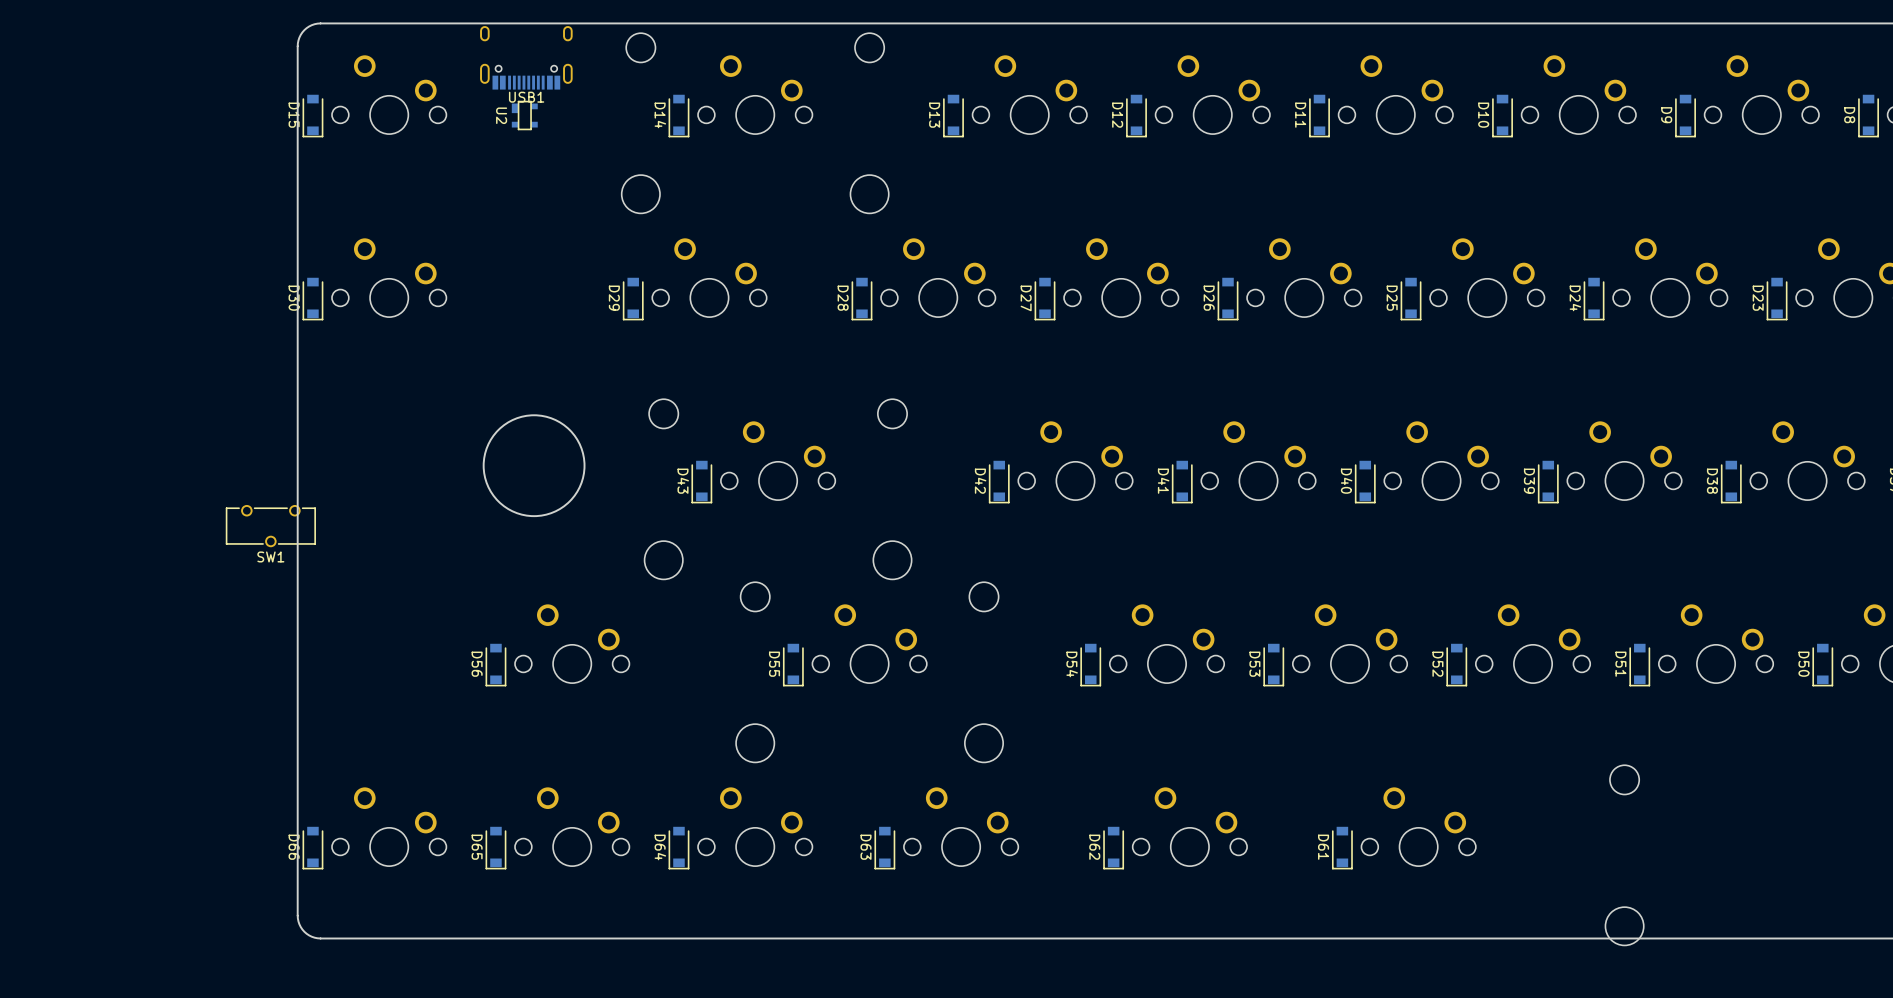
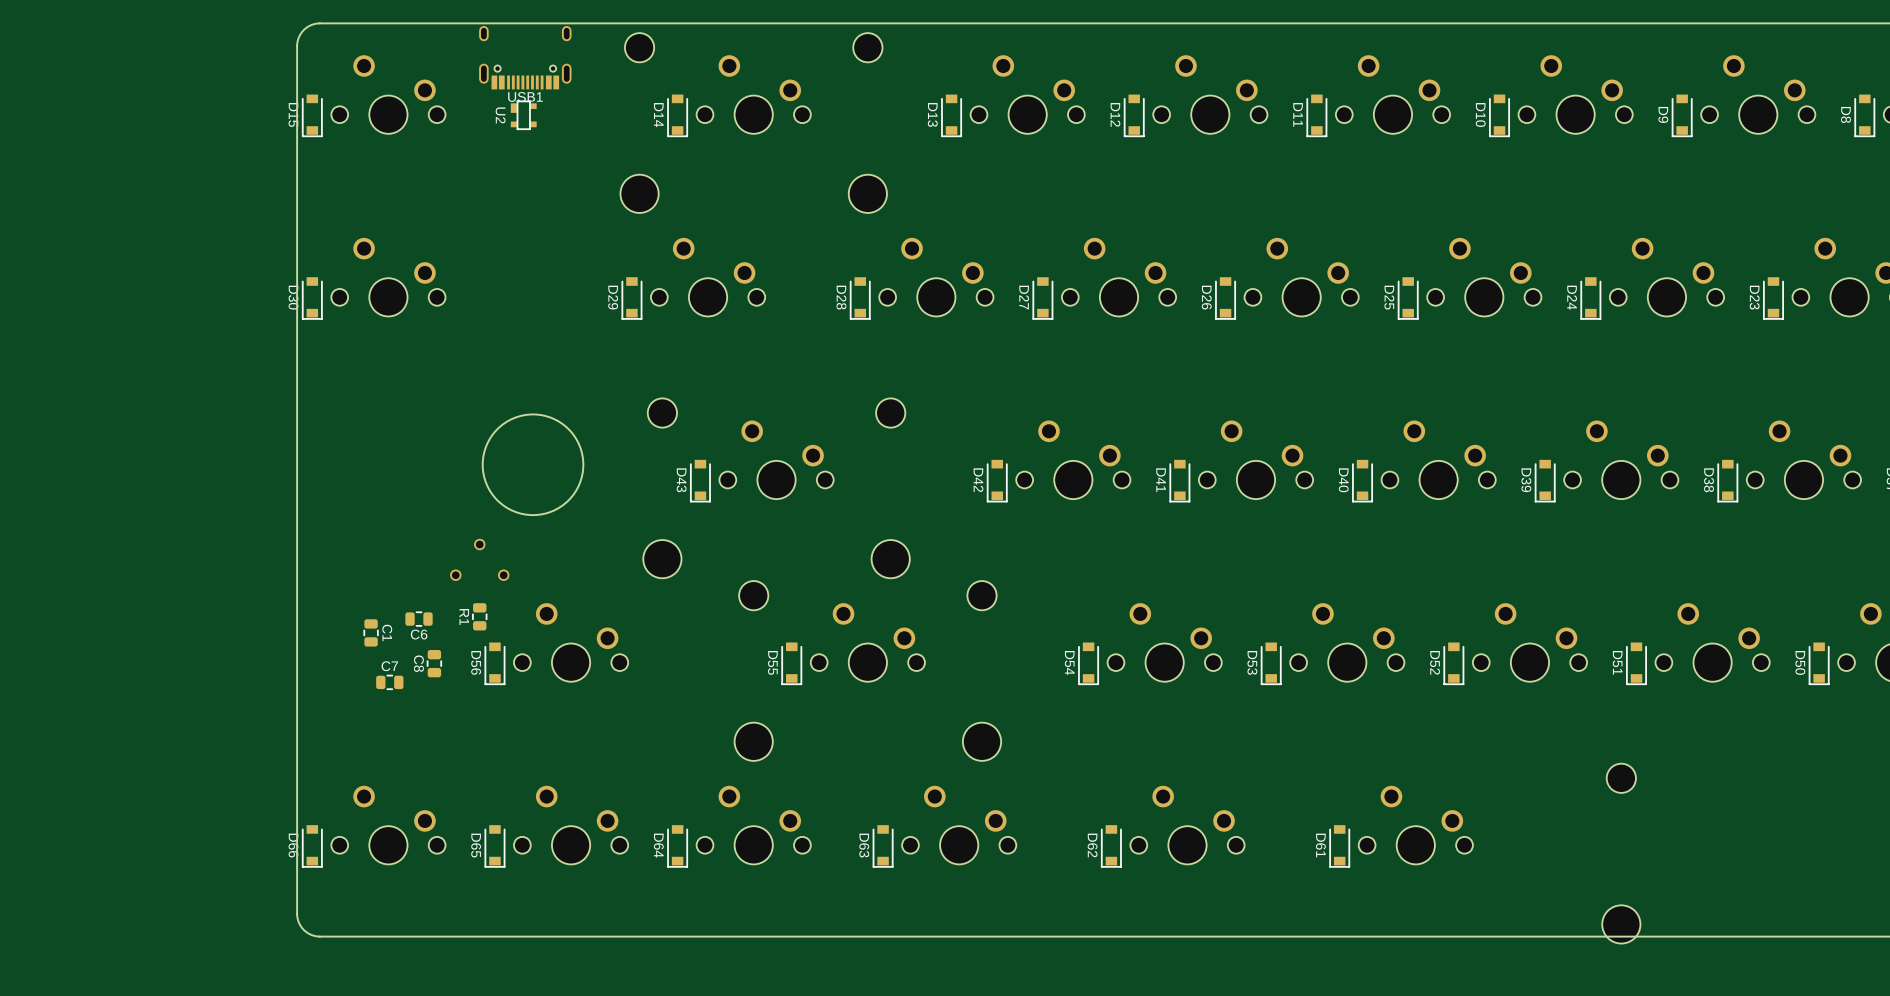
SW1 side: bottom (270, 526) -> top (479, 559)
R1: none -> (479, 616)
C6: none -> (419, 619)
C1: none -> (371, 632)
C8: none -> (434, 663)
C7: none -> (389, 682)

